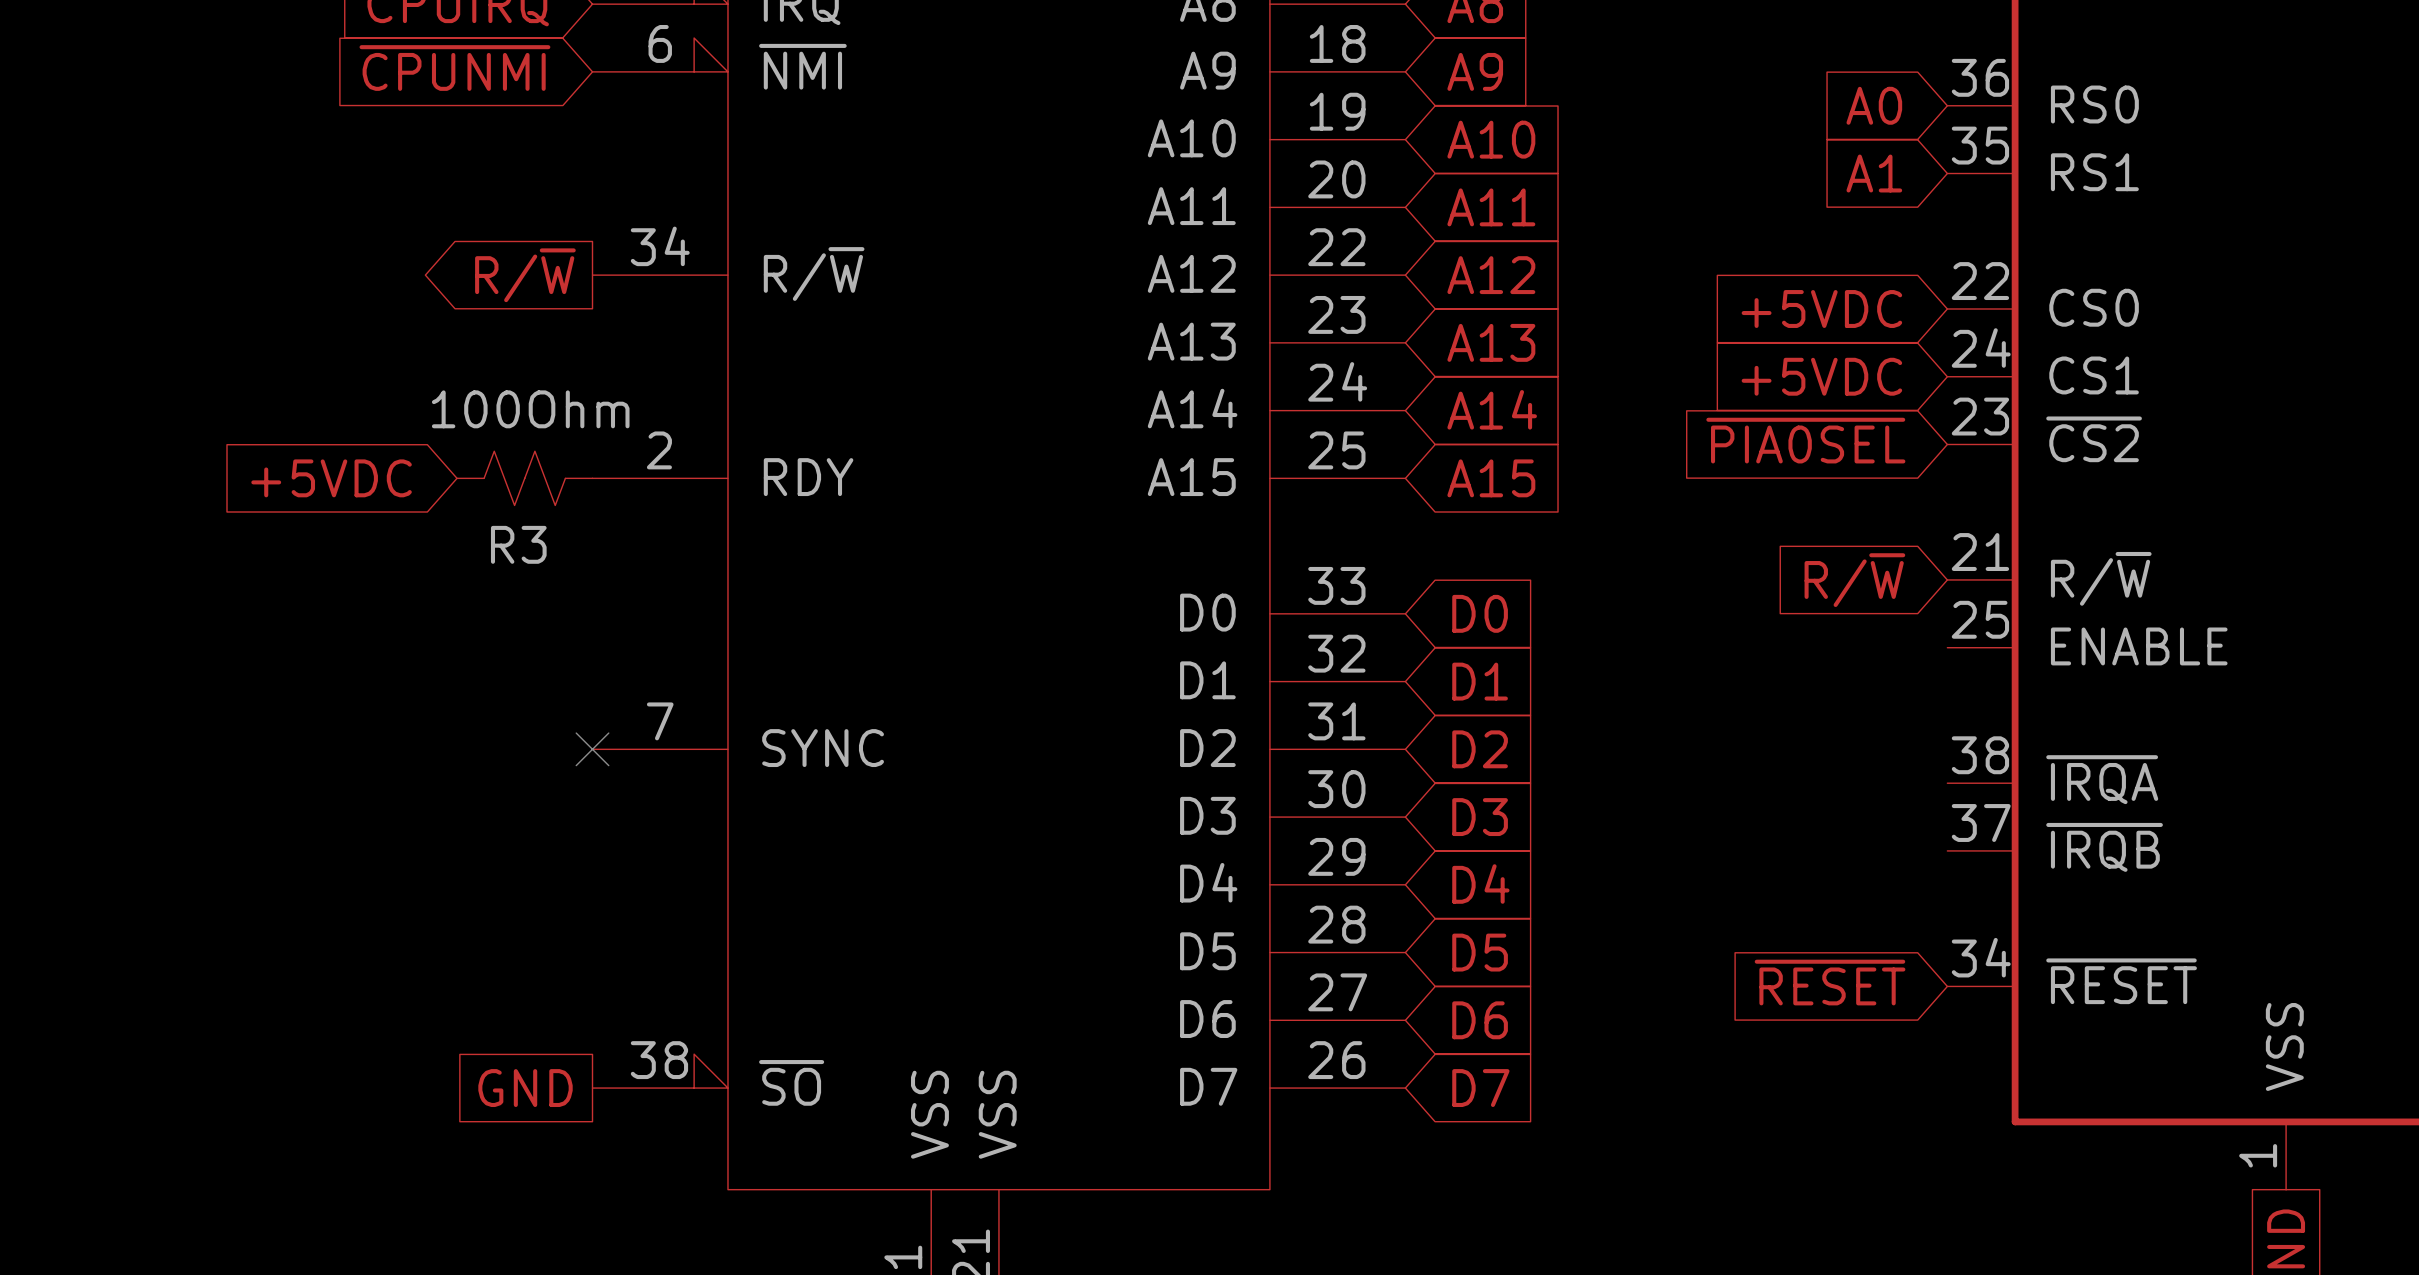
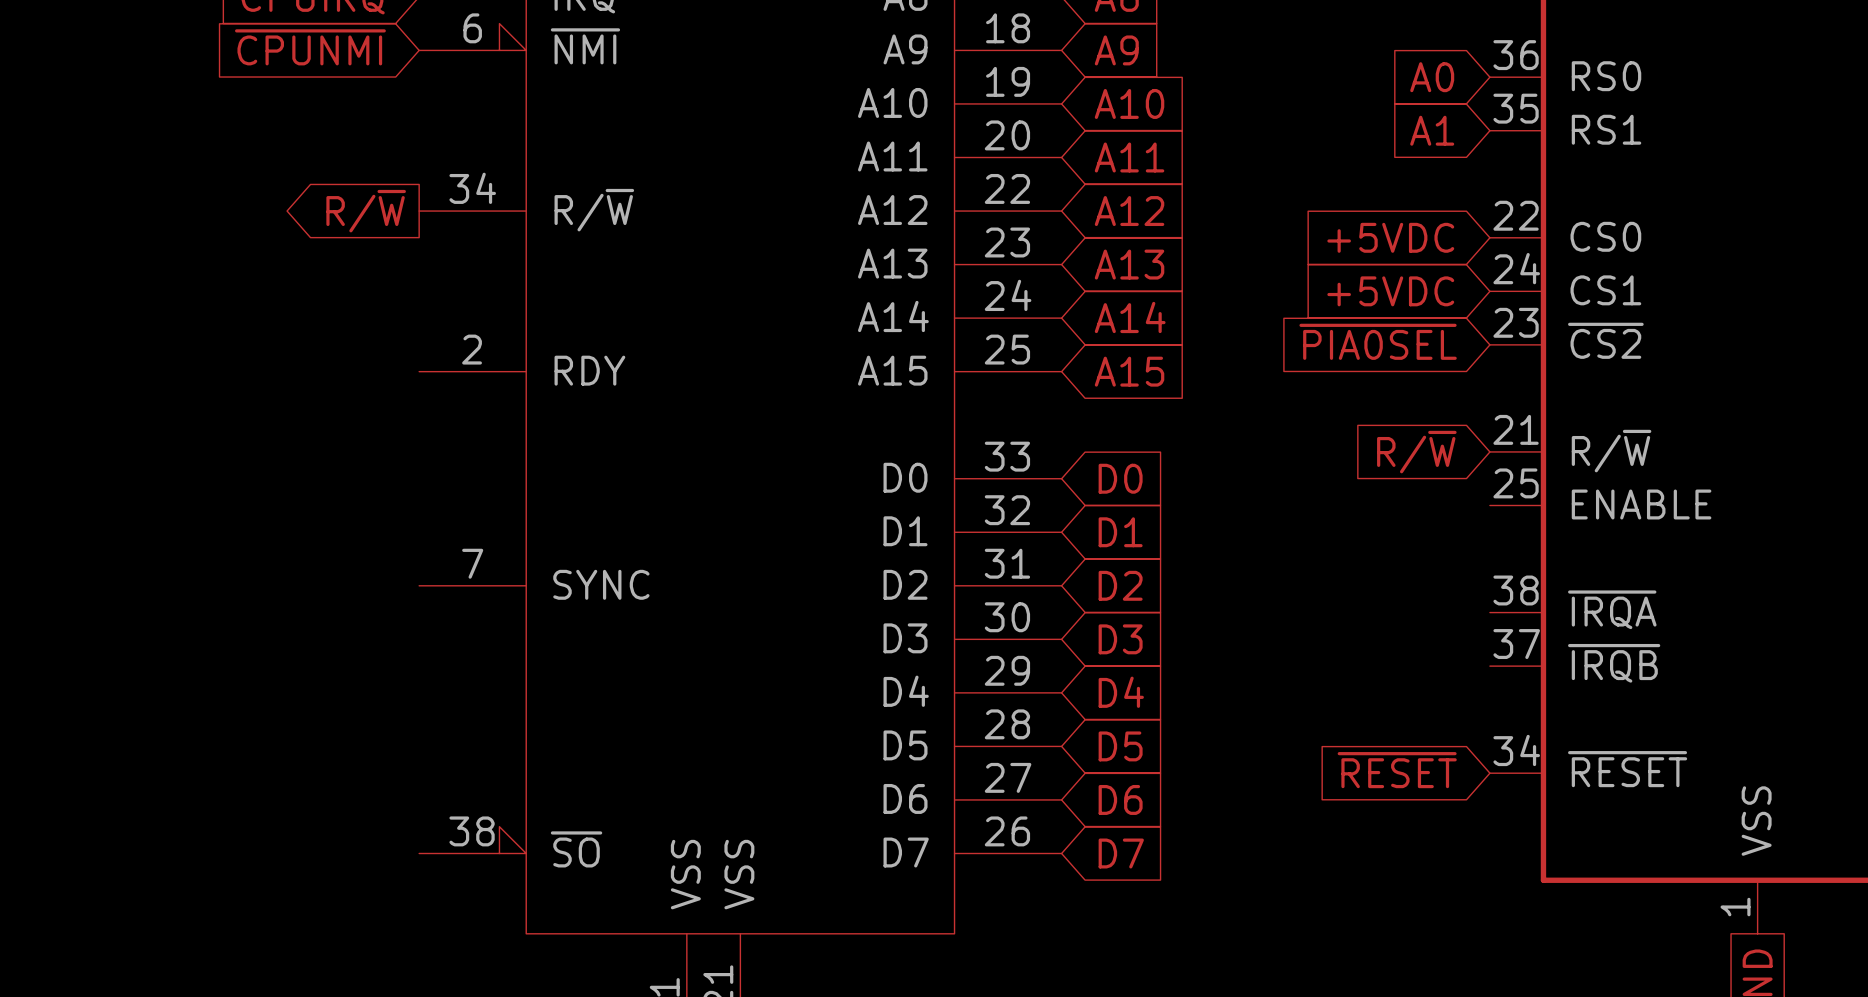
global label: +5VDC (331, 478) -> none
R3: 100Ohm (524, 478) -> none
no-connect mark: (592, 749) -> none
global label: GND (525, 1088) -> none

